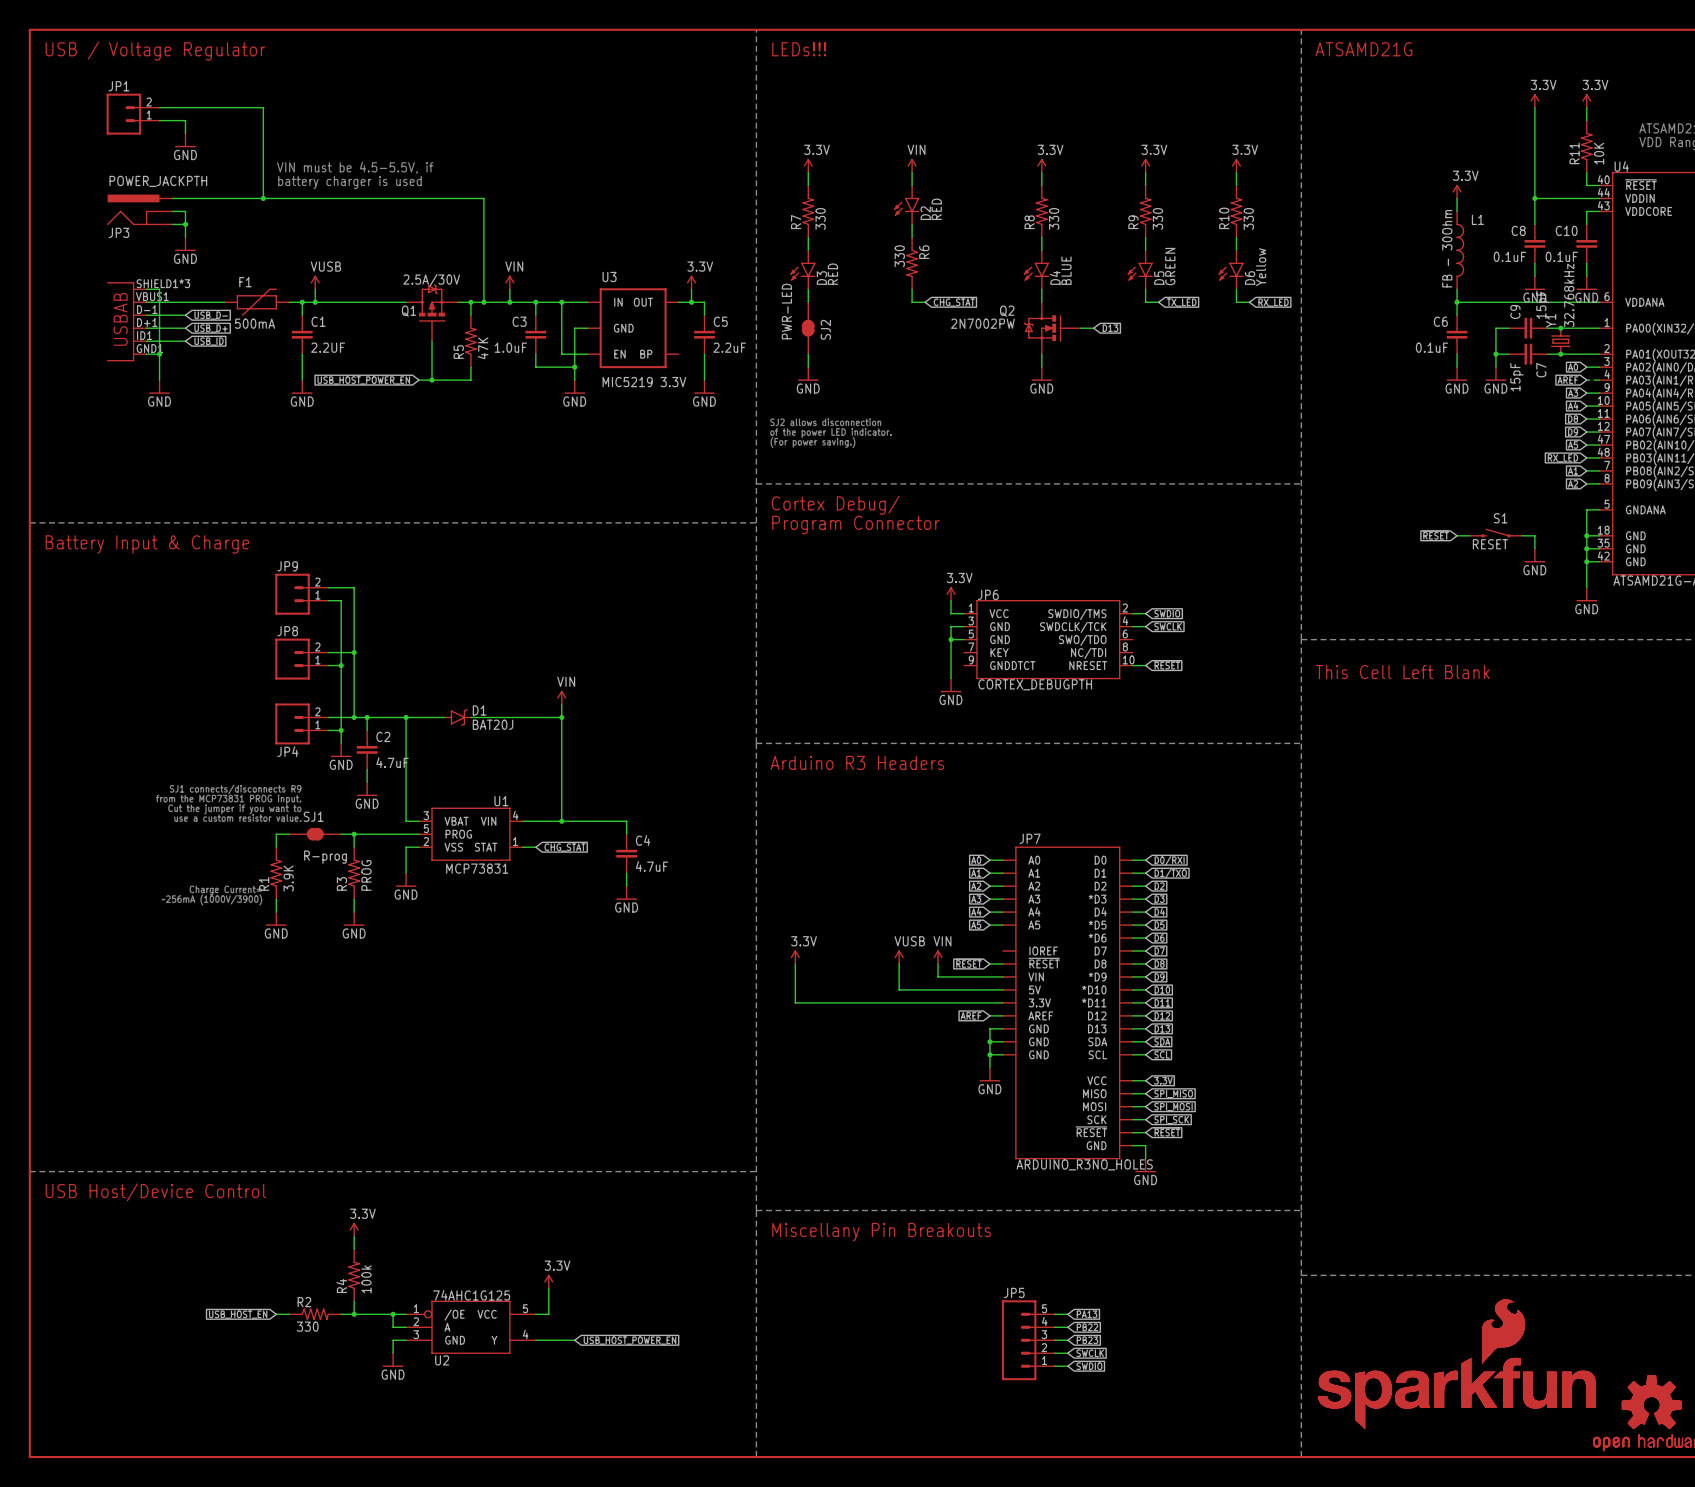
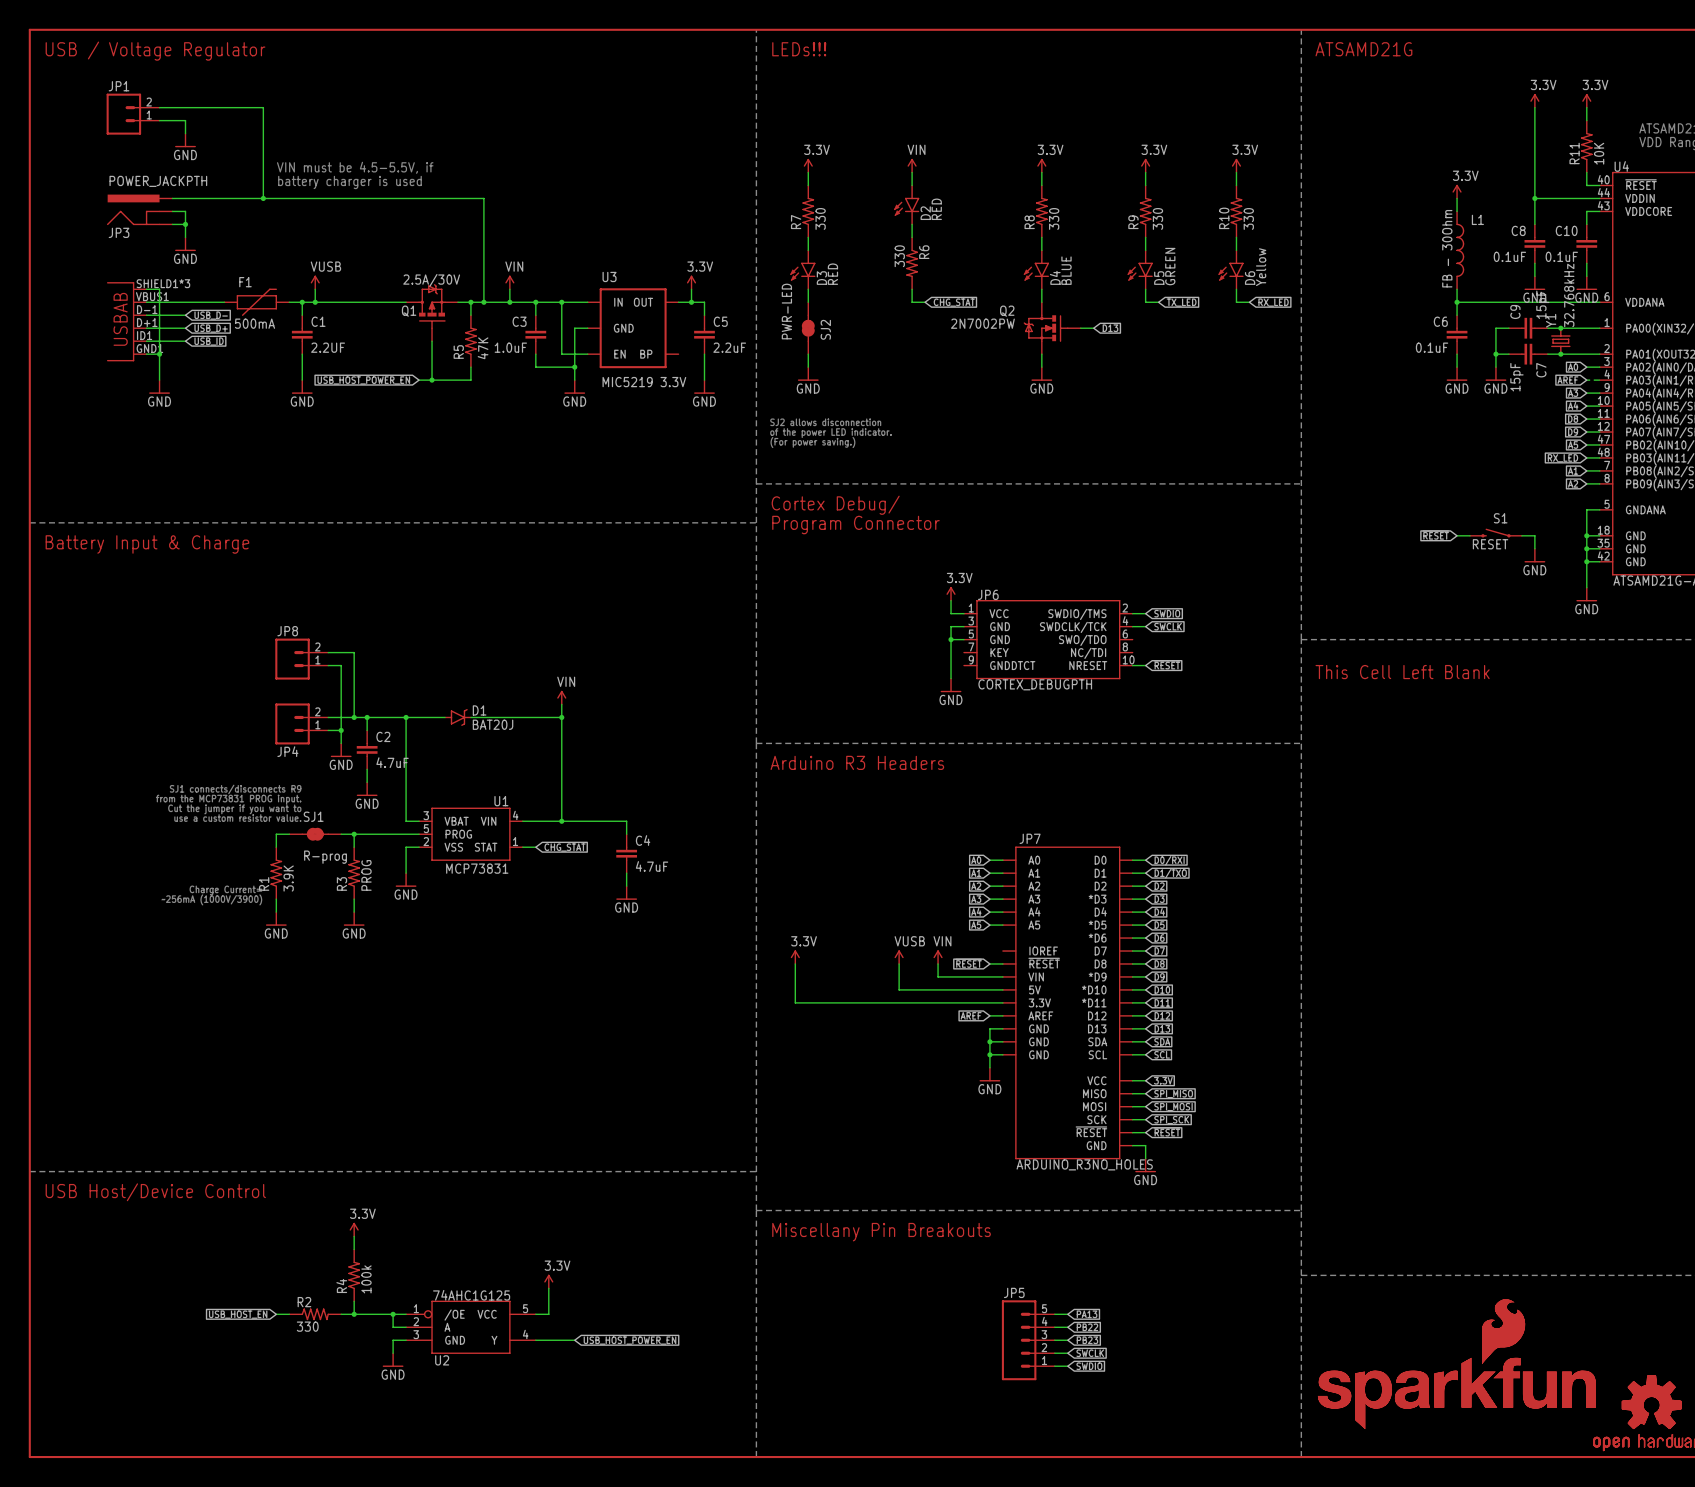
wire: (328, 587) (354, 587) (354, 652) -> none
JP9: (301, 594) -> none
wire: (328, 600) (341, 600) (341, 665) -> none
junction: (354, 652) -> none
junction: (341, 665) -> none

